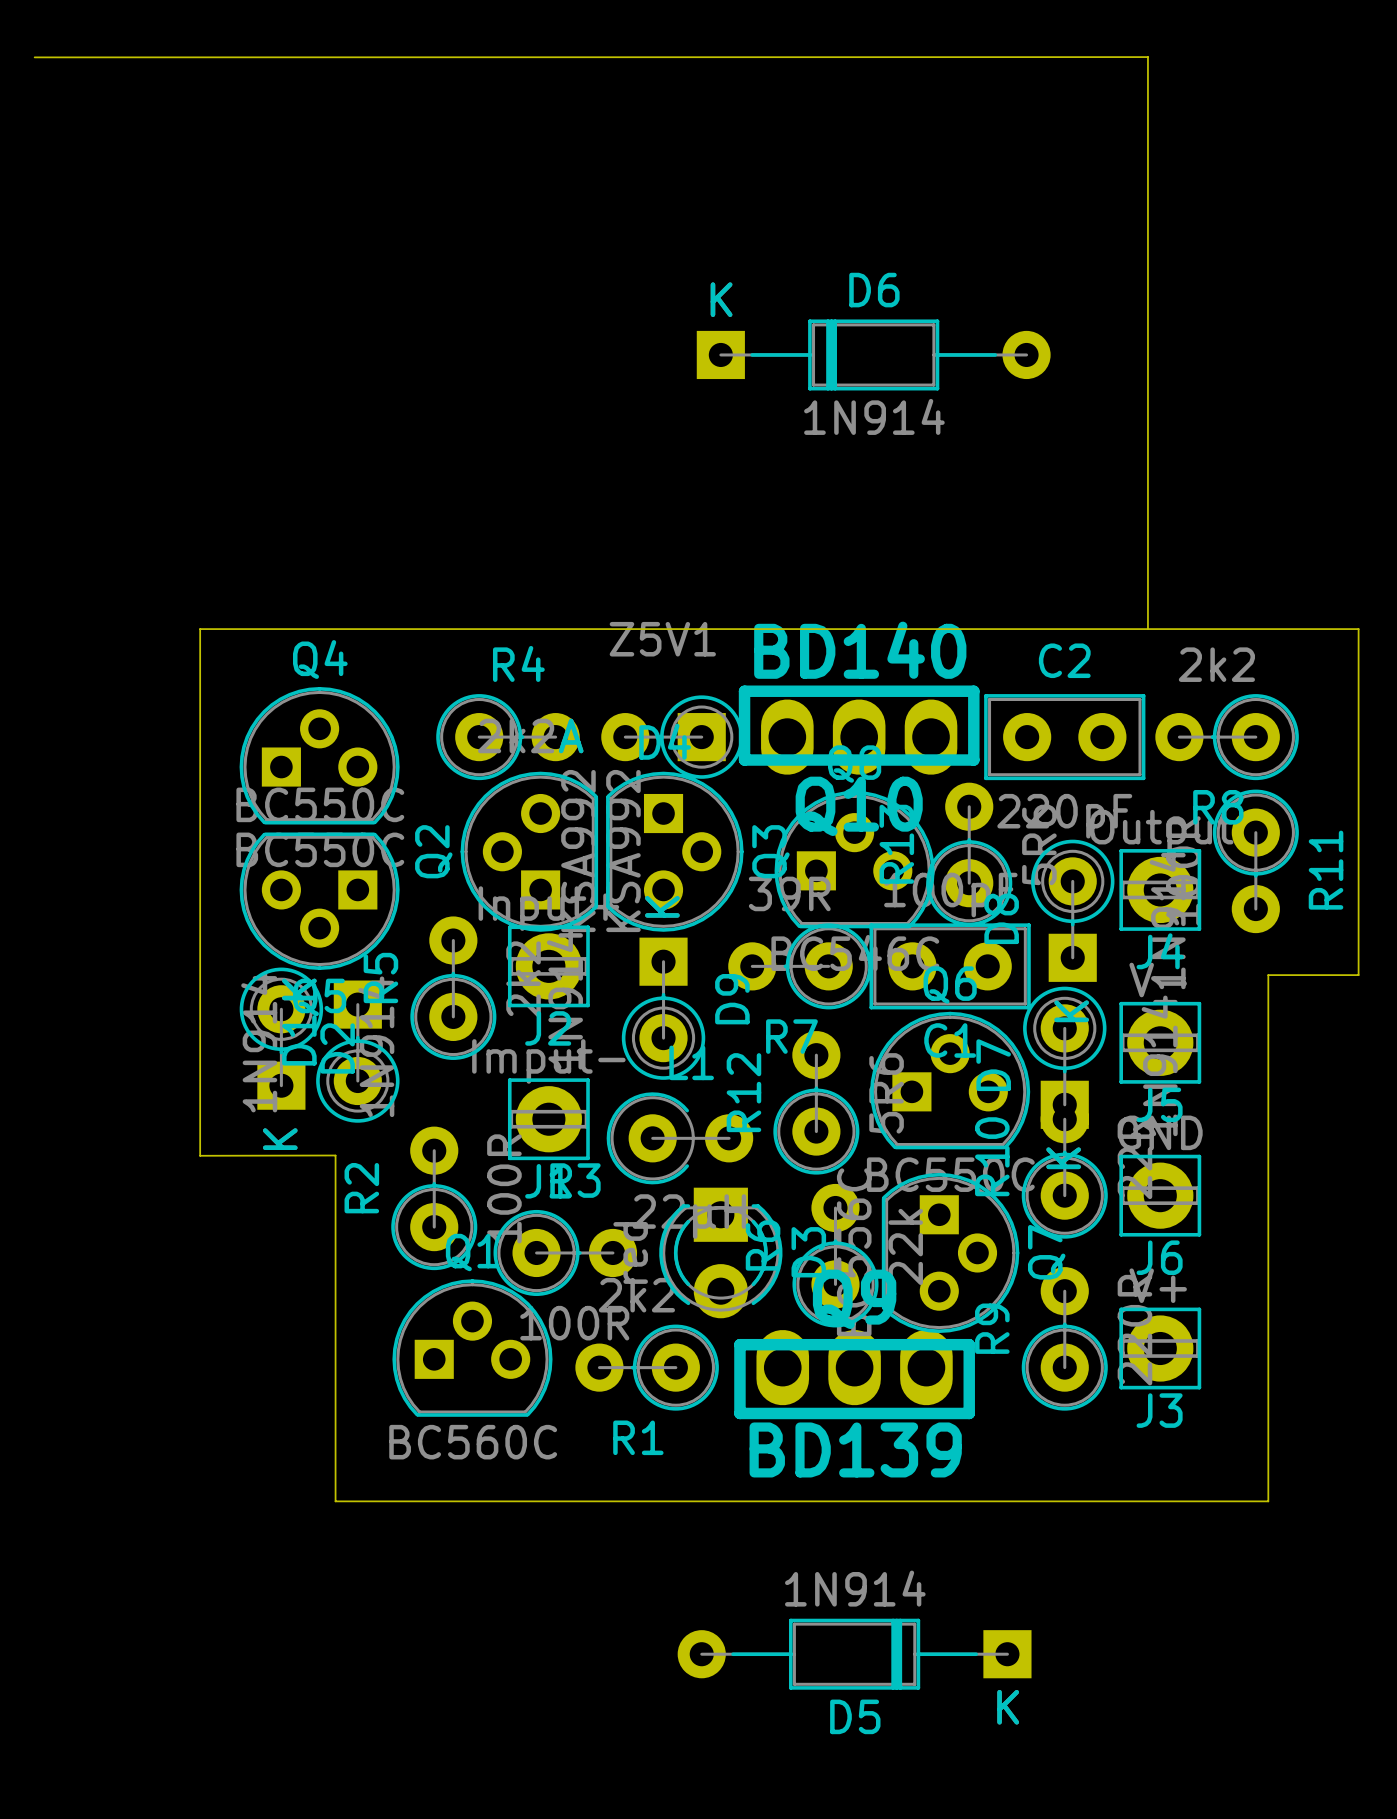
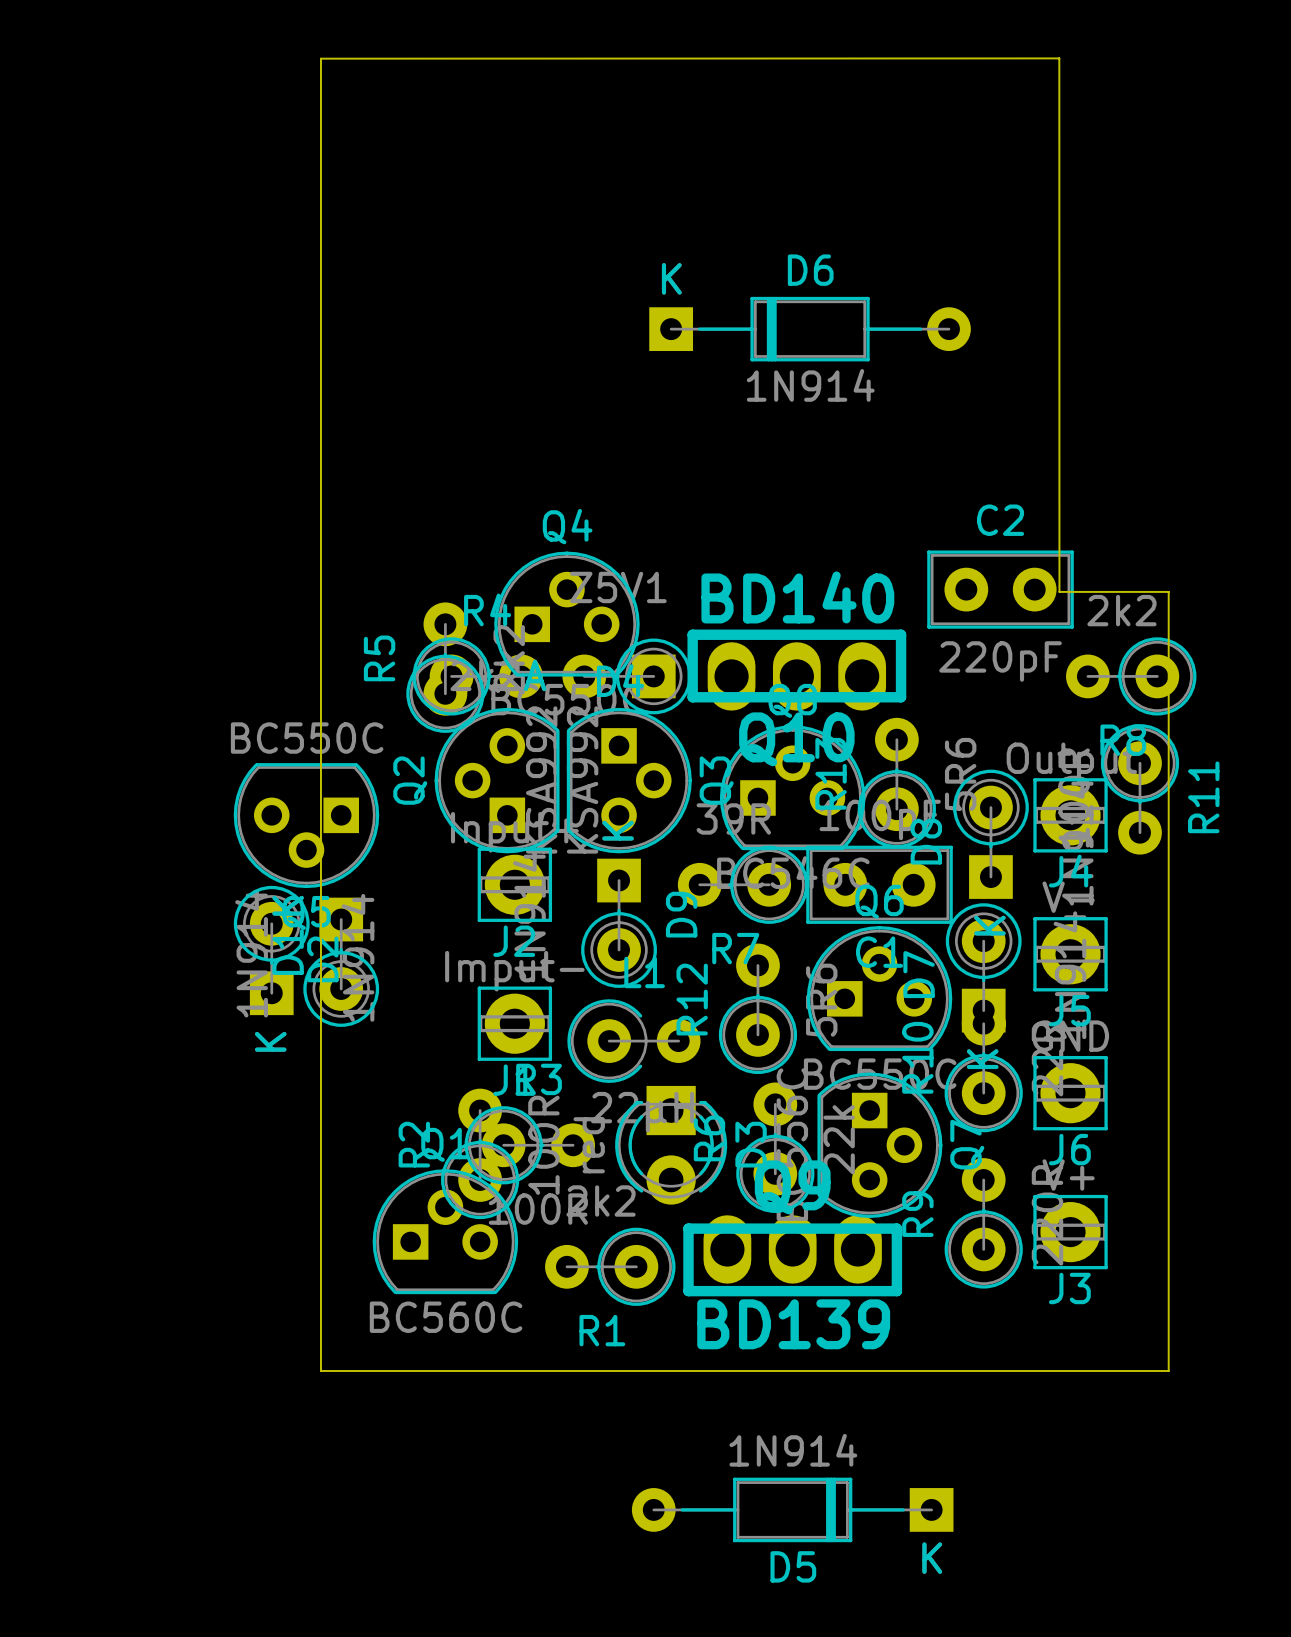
board edge: (34, 57) (1147, 57) (1147, 629) -> none
C2 position: (1064, 737) -> (1000, 589)
Q4 position: (319, 755) -> (566, 614)
R11 position: (1255, 861) -> (1139, 789)
board edge: (1268, 975) (1358, 975) (1358, 629) (200, 629) (200, 1155) (335, 1155) -> (1168, 892) (1168, 591) (1059, 591) (1059, 58) (320, 58) (320, 1056)
R5 position: (453, 988) -> (445, 667)
R2 position: (434, 1198) -> (480, 1153)
R1 position: (647, 1367) -> (610, 1266)

